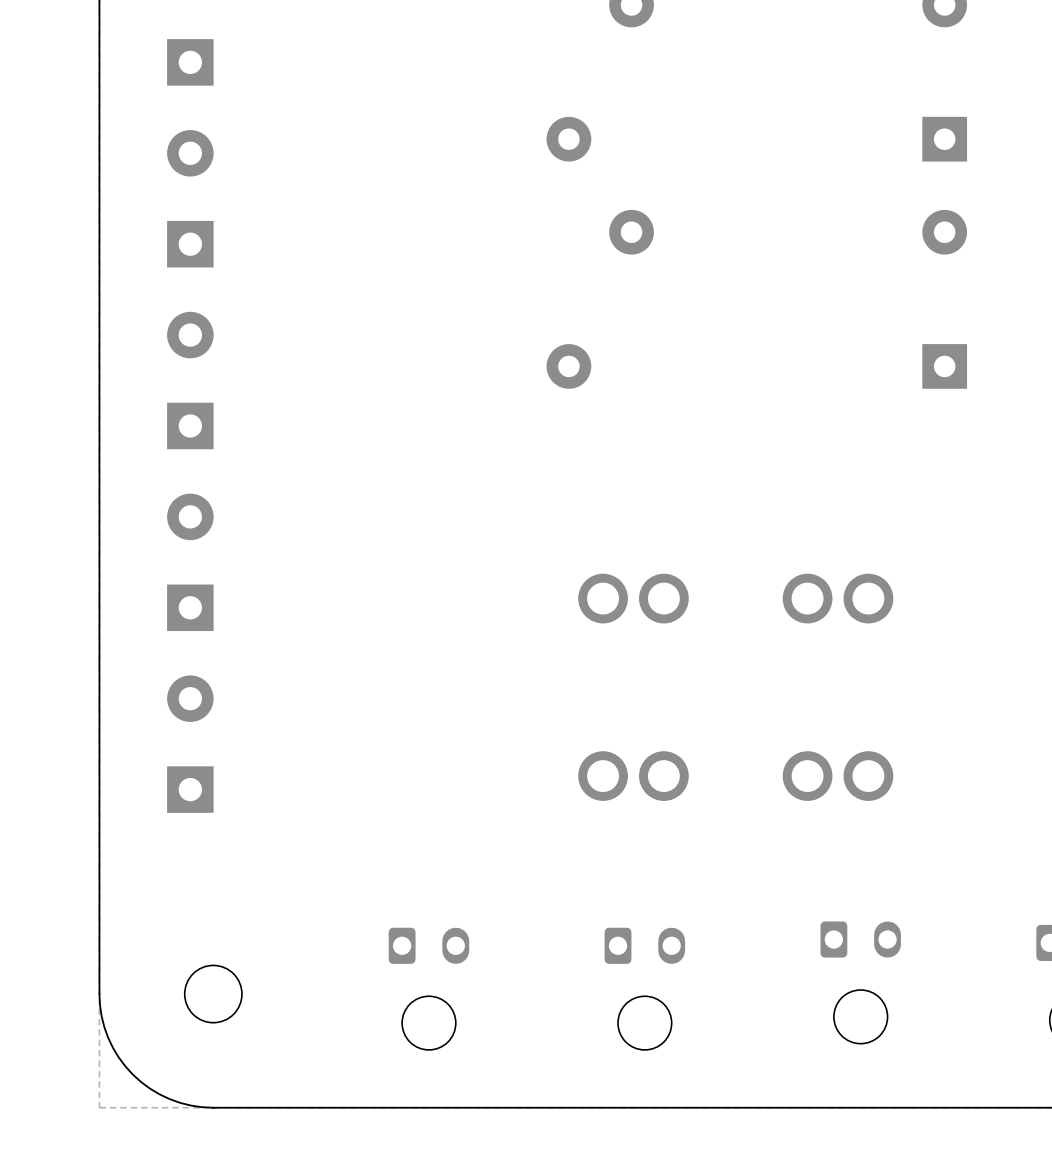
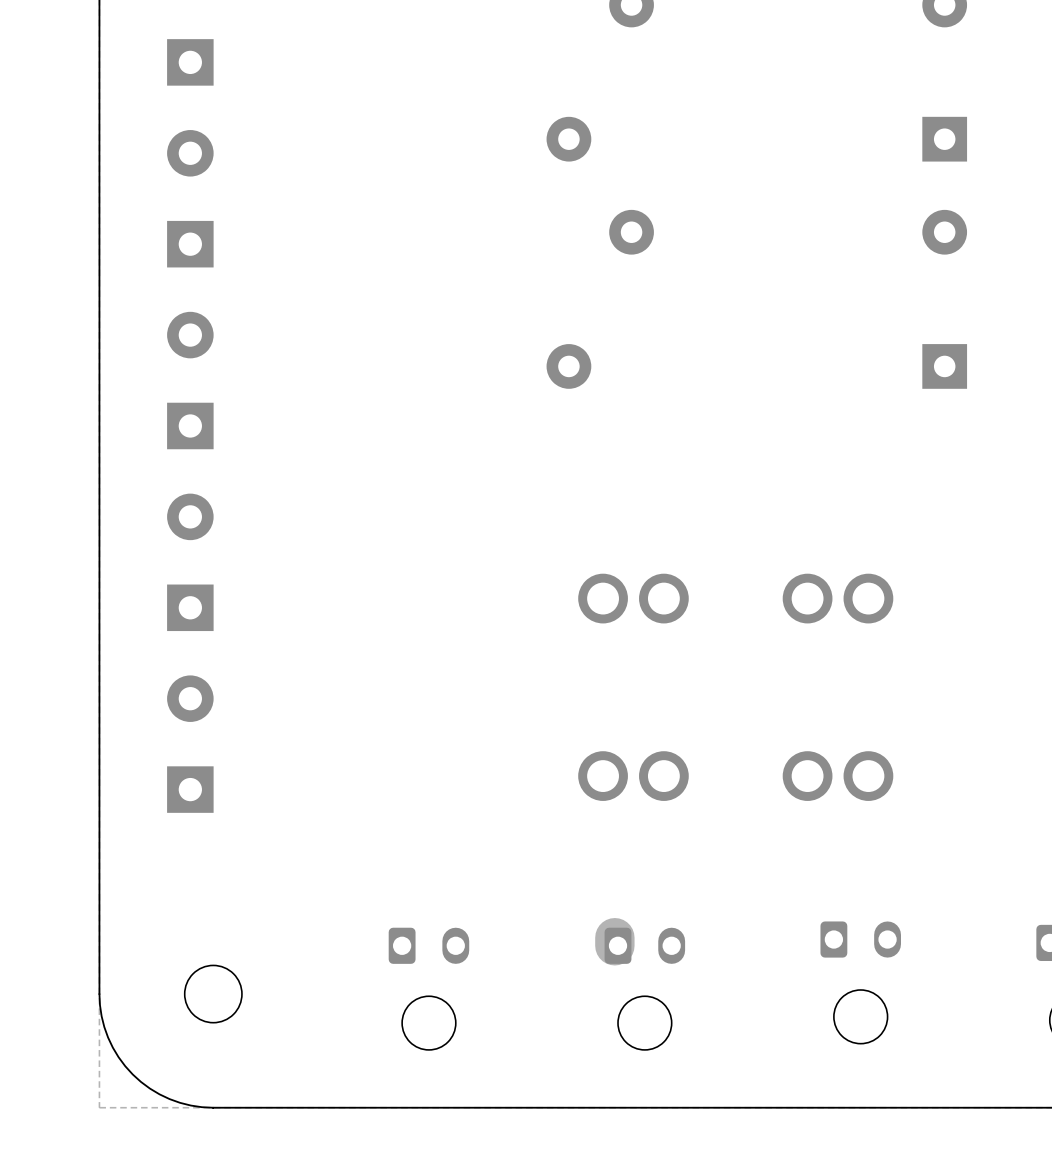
track: none -> (614, 937) (614, 945)

